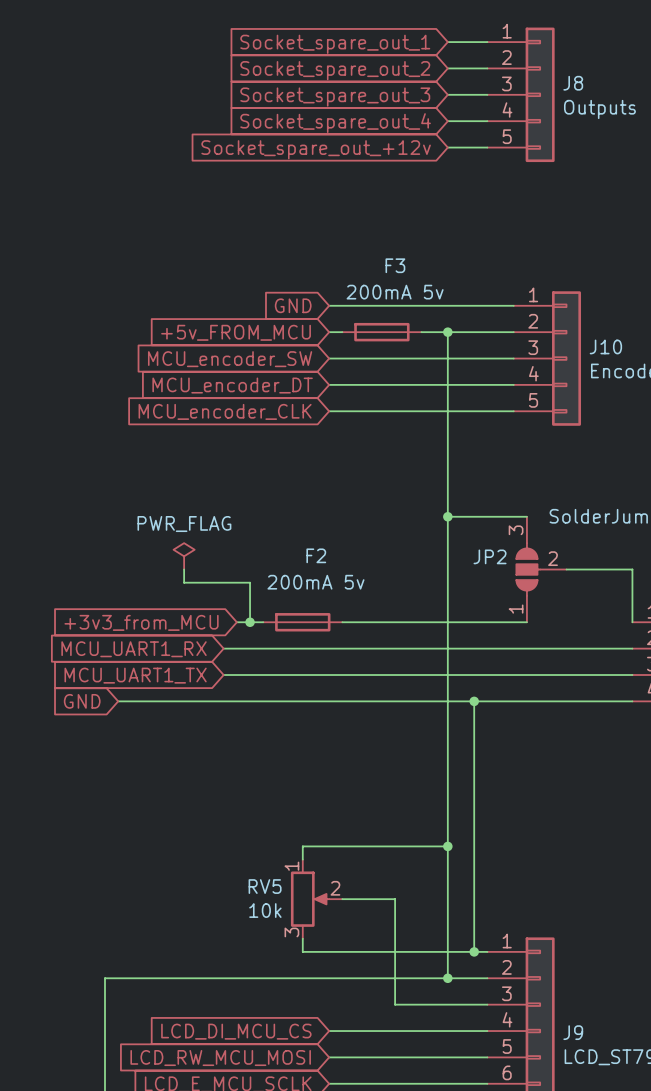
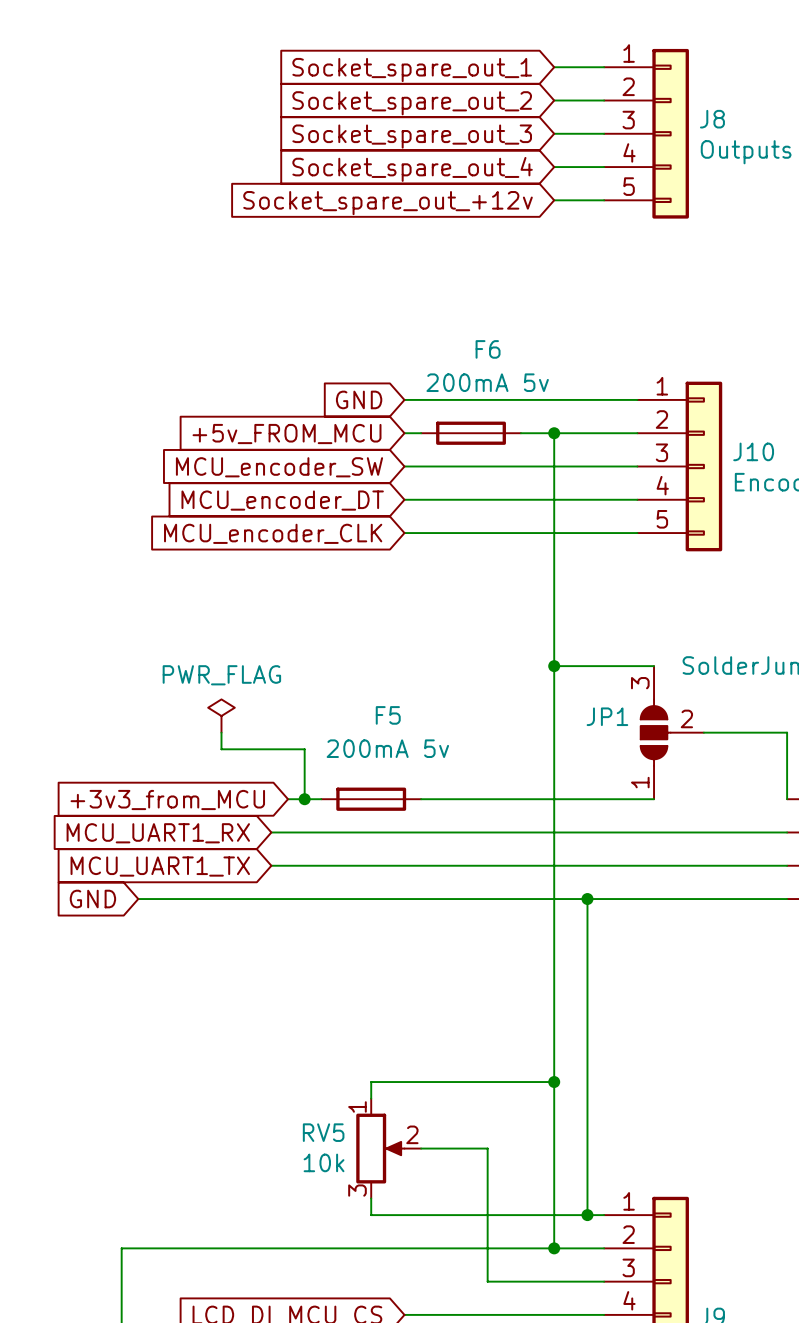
F3 name: F3 (395, 265) -> F6 (488, 349)
F2 name: F2 (316, 555) -> F5 (388, 715)
JP2 name: JP2 (490, 556) -> JP1 (607, 716)

